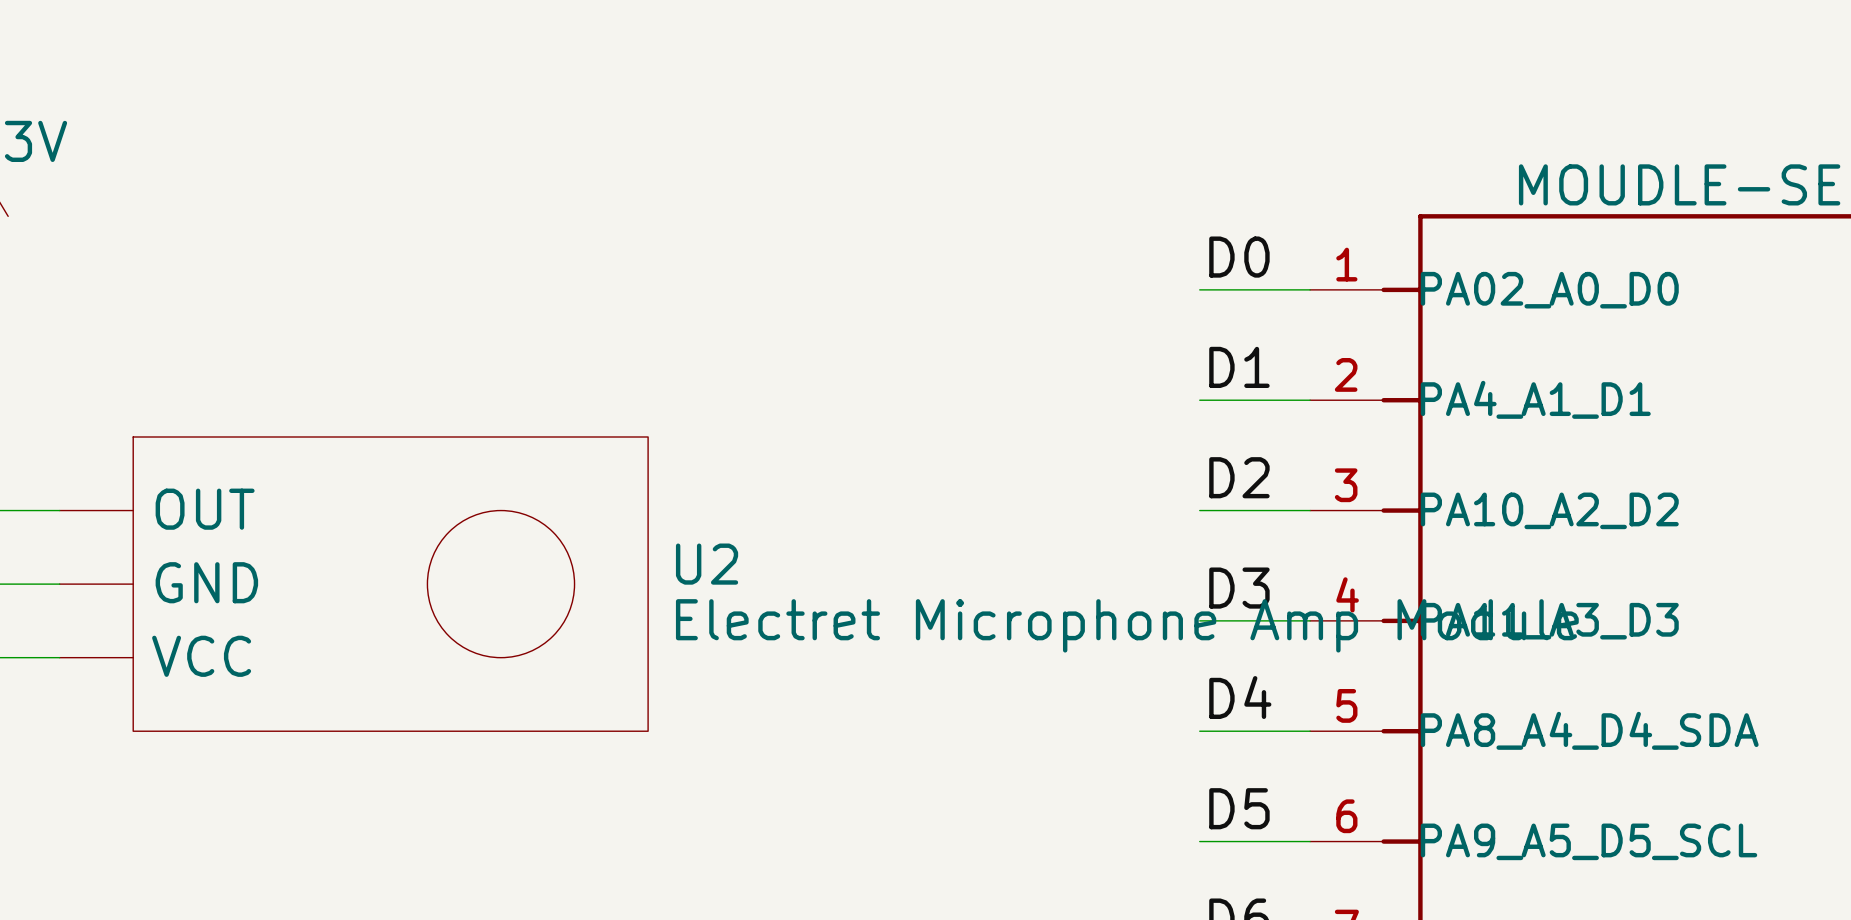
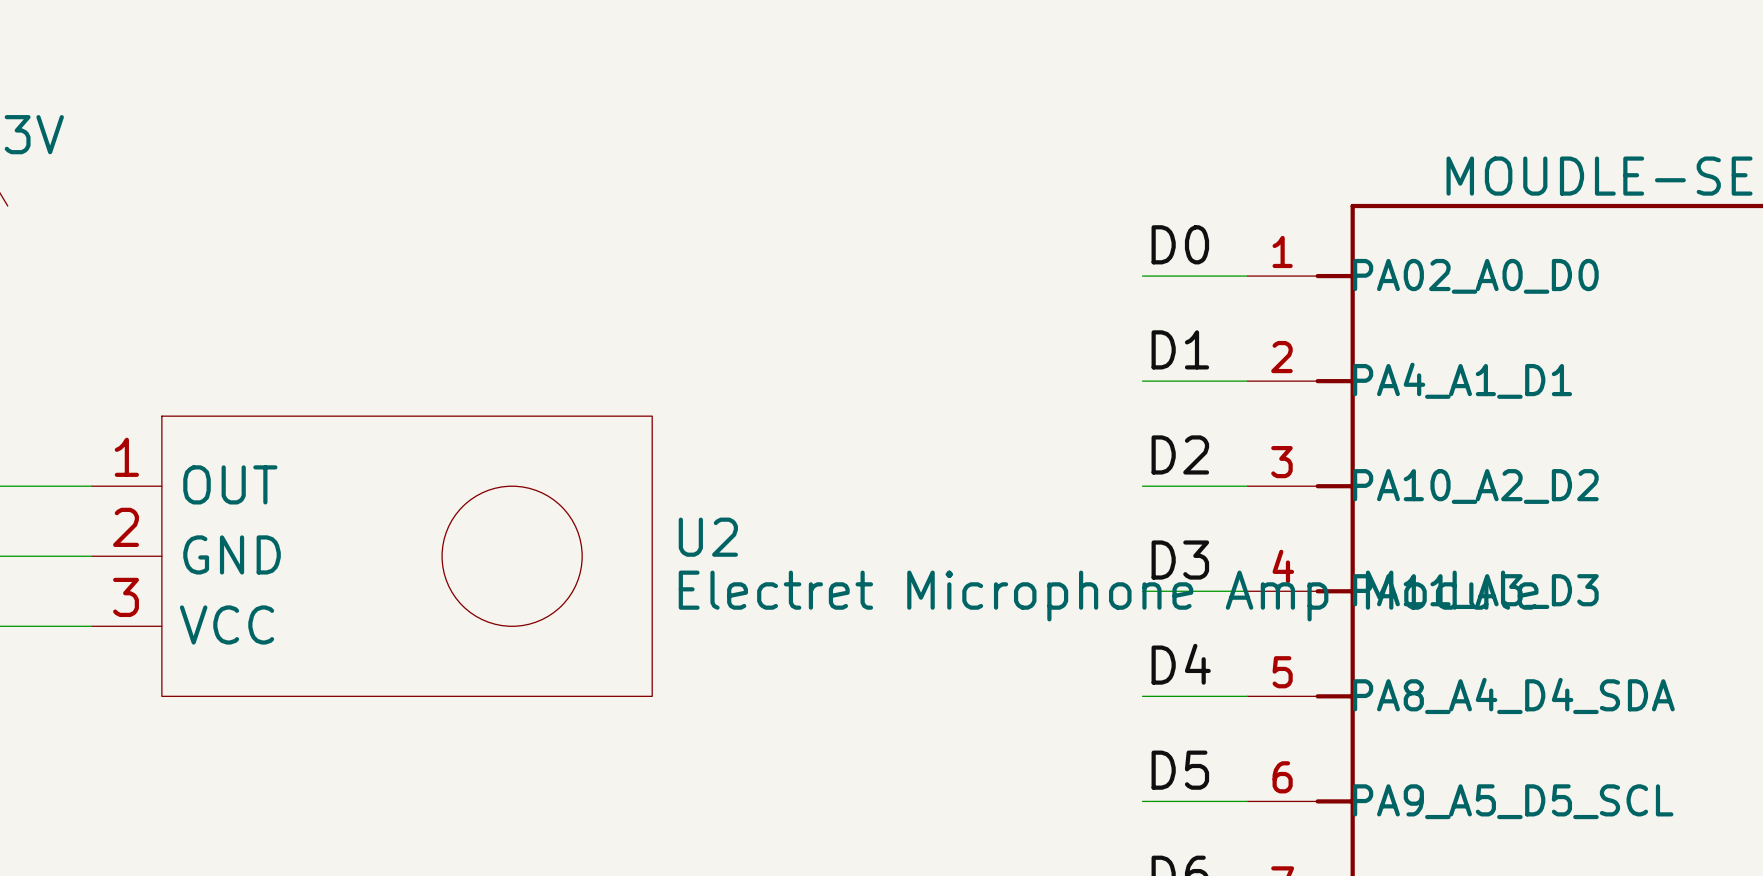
U2 pin number: none -> 1 (126, 457)
U2 pin number: none -> 2 (126, 527)
U2 position: (353, 584) -> (372, 556)
U2 pin number: none -> 3 (126, 597)

